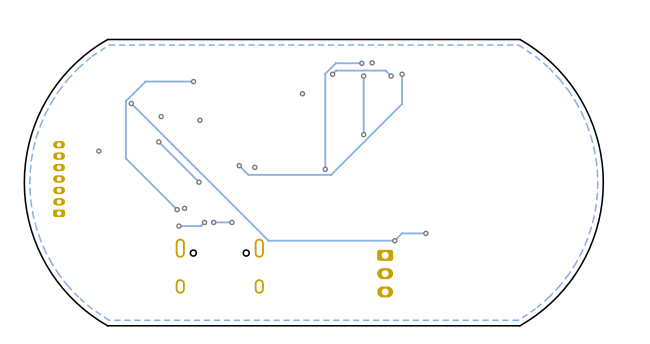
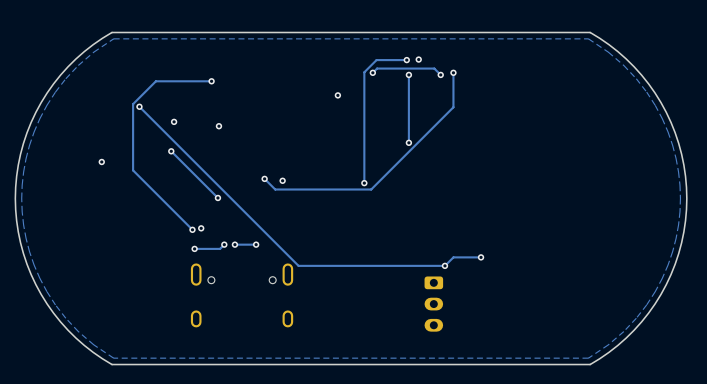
part: (59, 178) -> none

